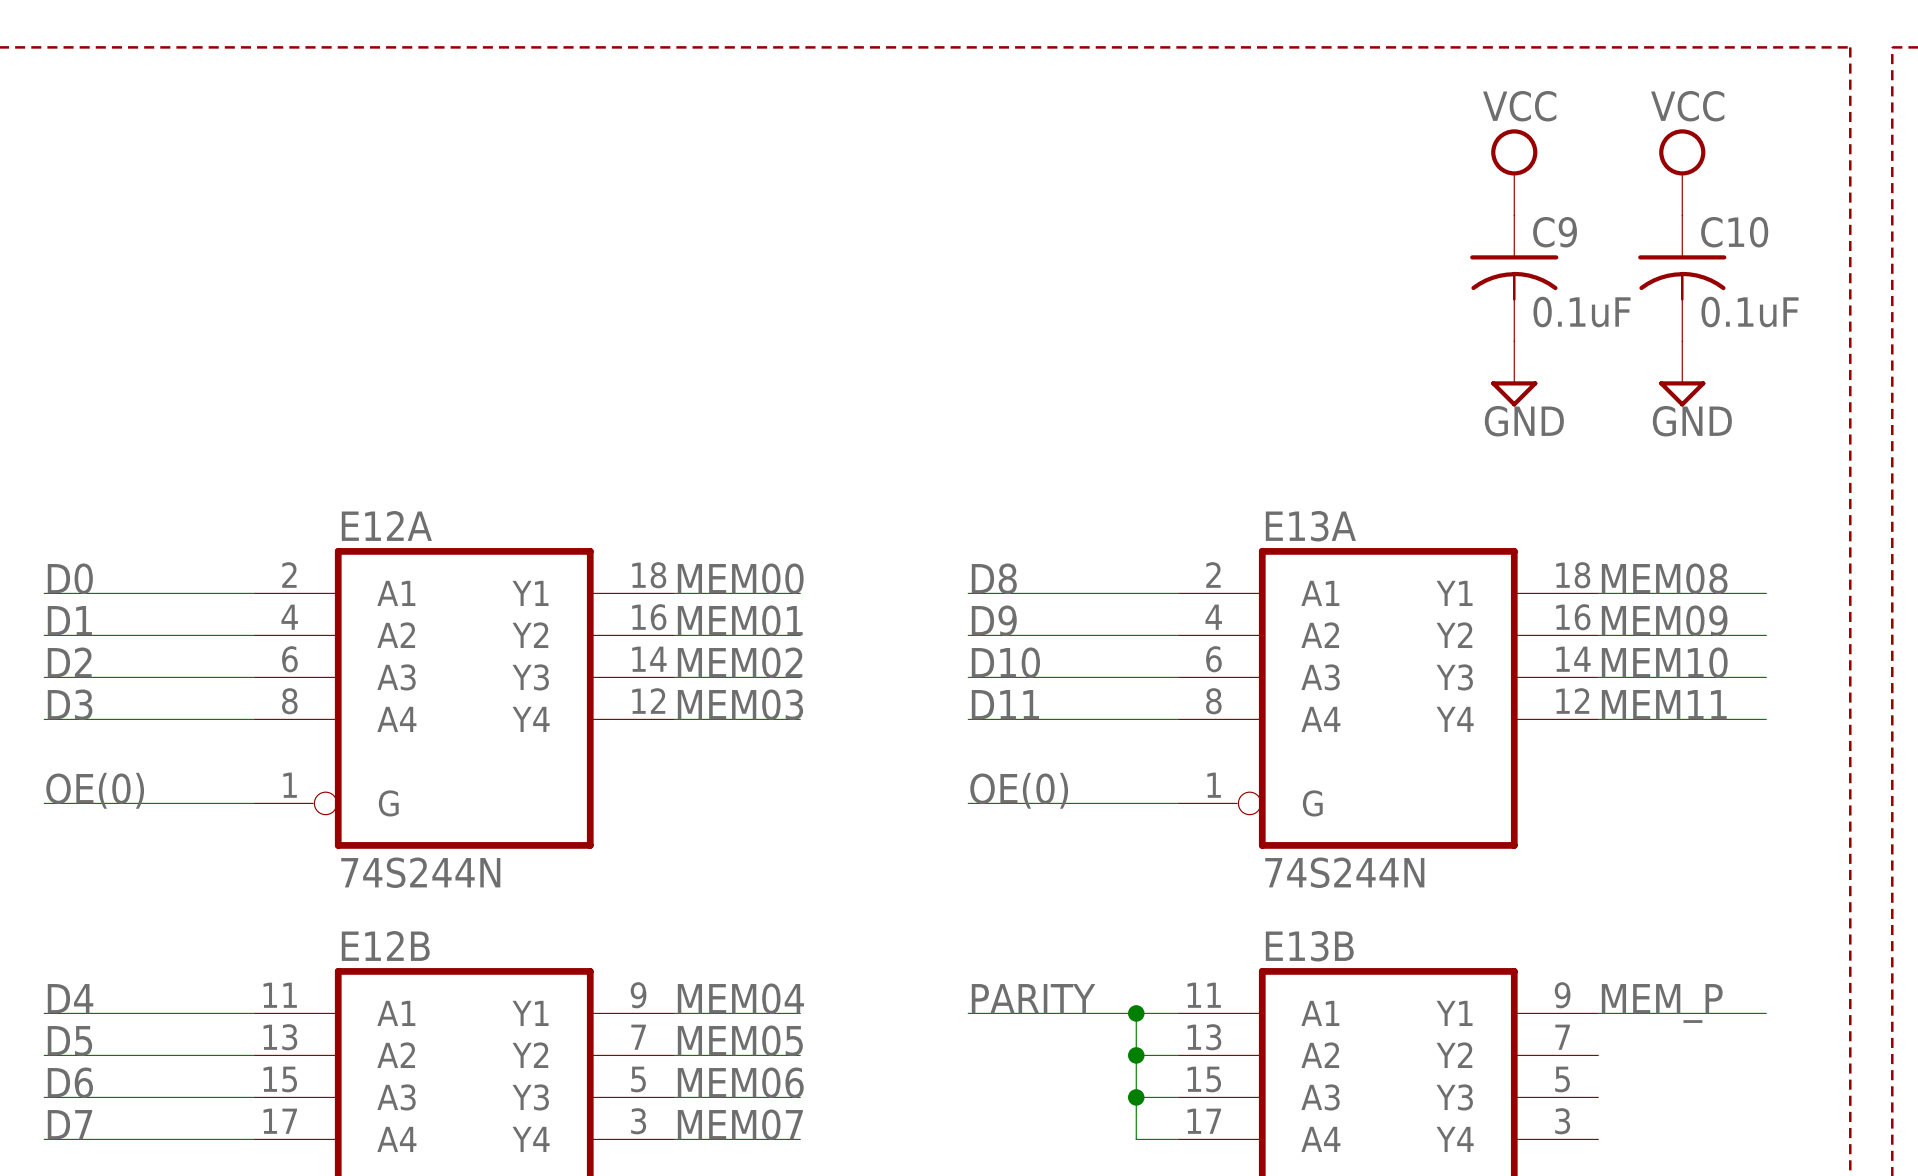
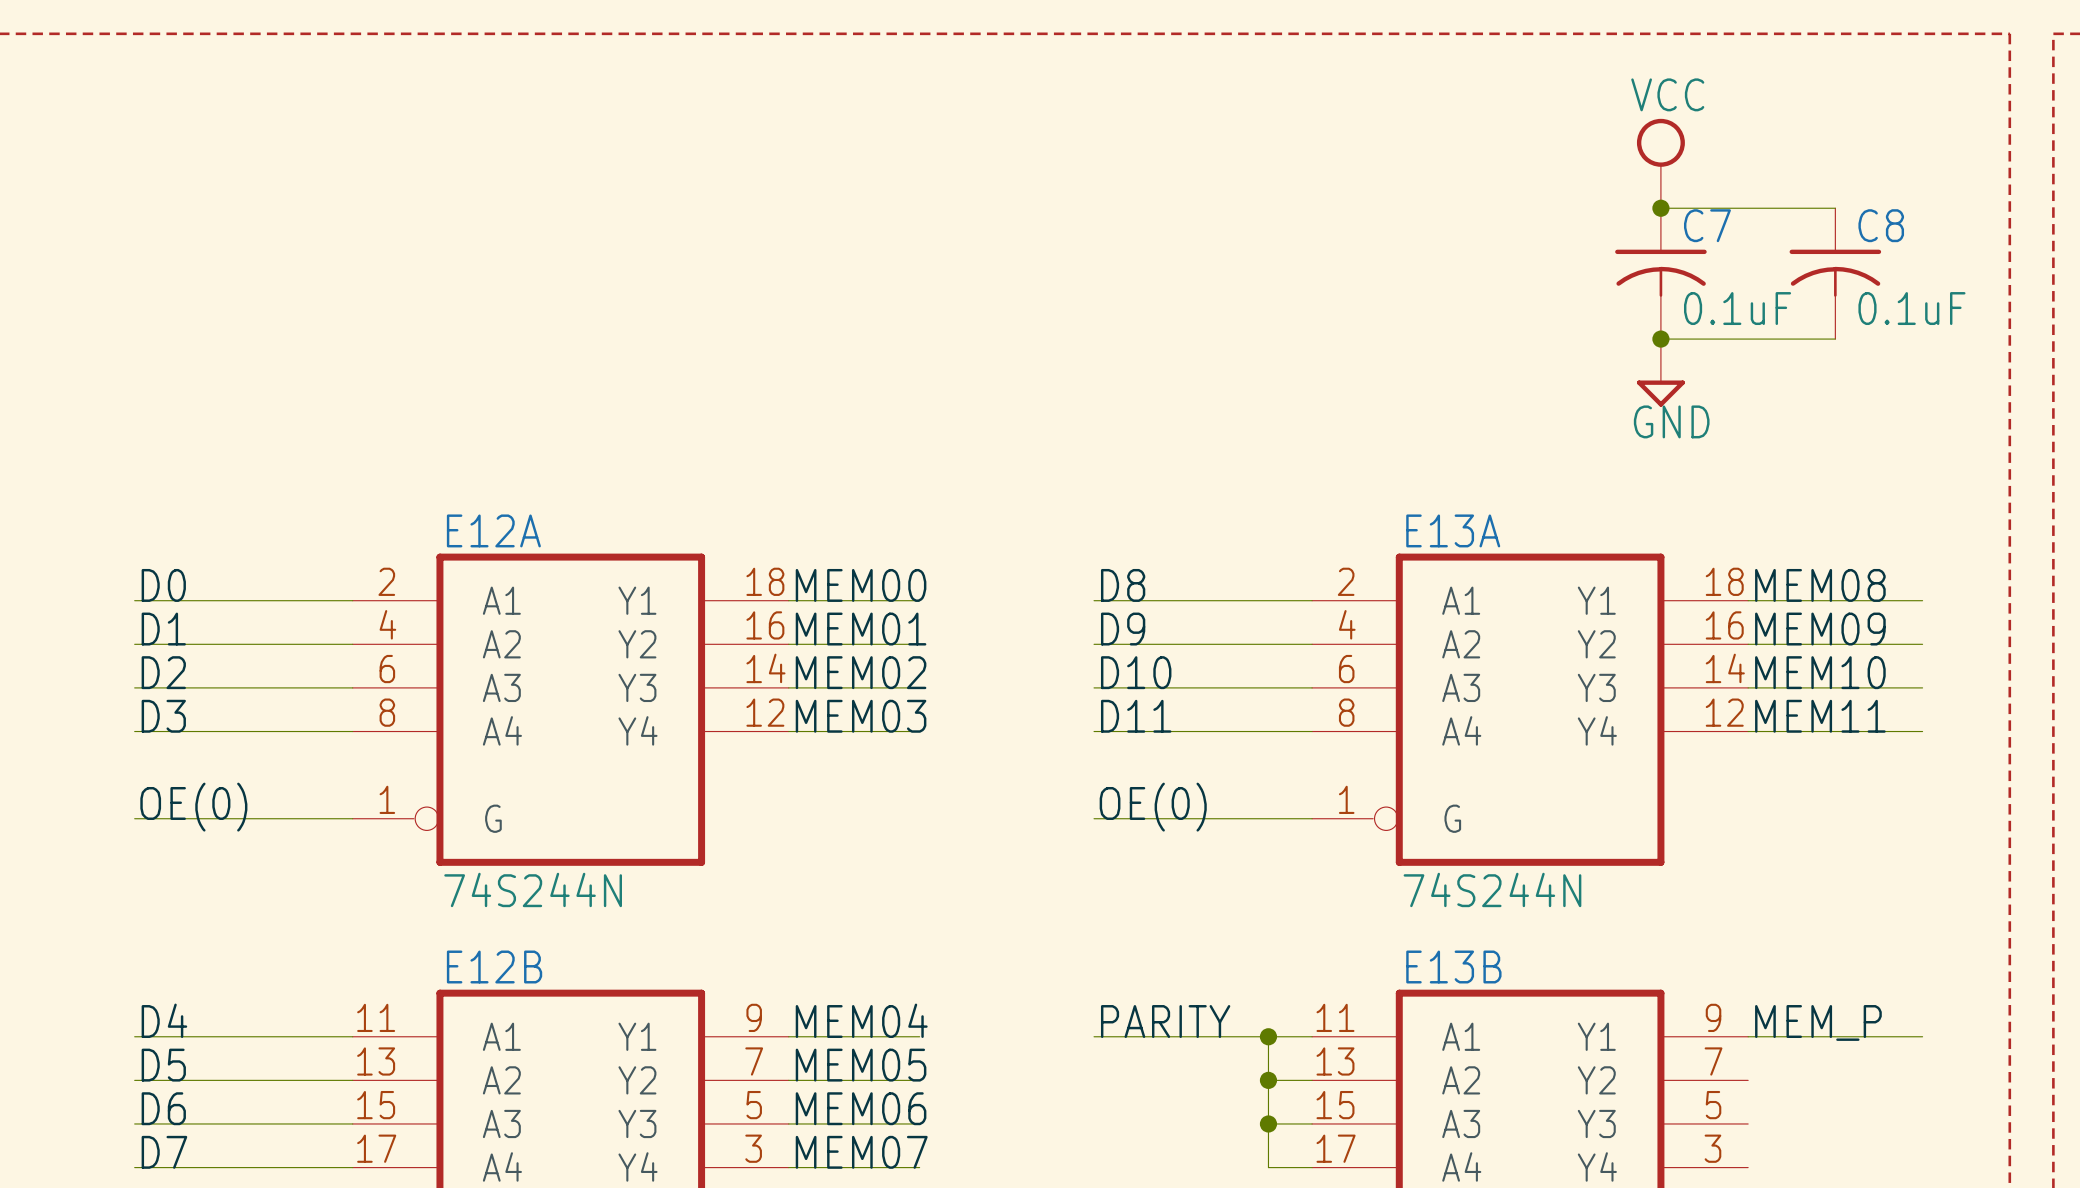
power symbol: VCC (1682, 172) -> none
wire: none -> (1660, 208) (1835, 208)
junction: none -> (1660, 208)
C9 name: C9 (1555, 232) -> C7 (1707, 225)
C10 name: C10 (1734, 232) -> C8 (1881, 225)
wire: none -> (1660, 339) (1835, 339)
junction: none -> (1660, 339)
power symbol: GND (1682, 373) -> none

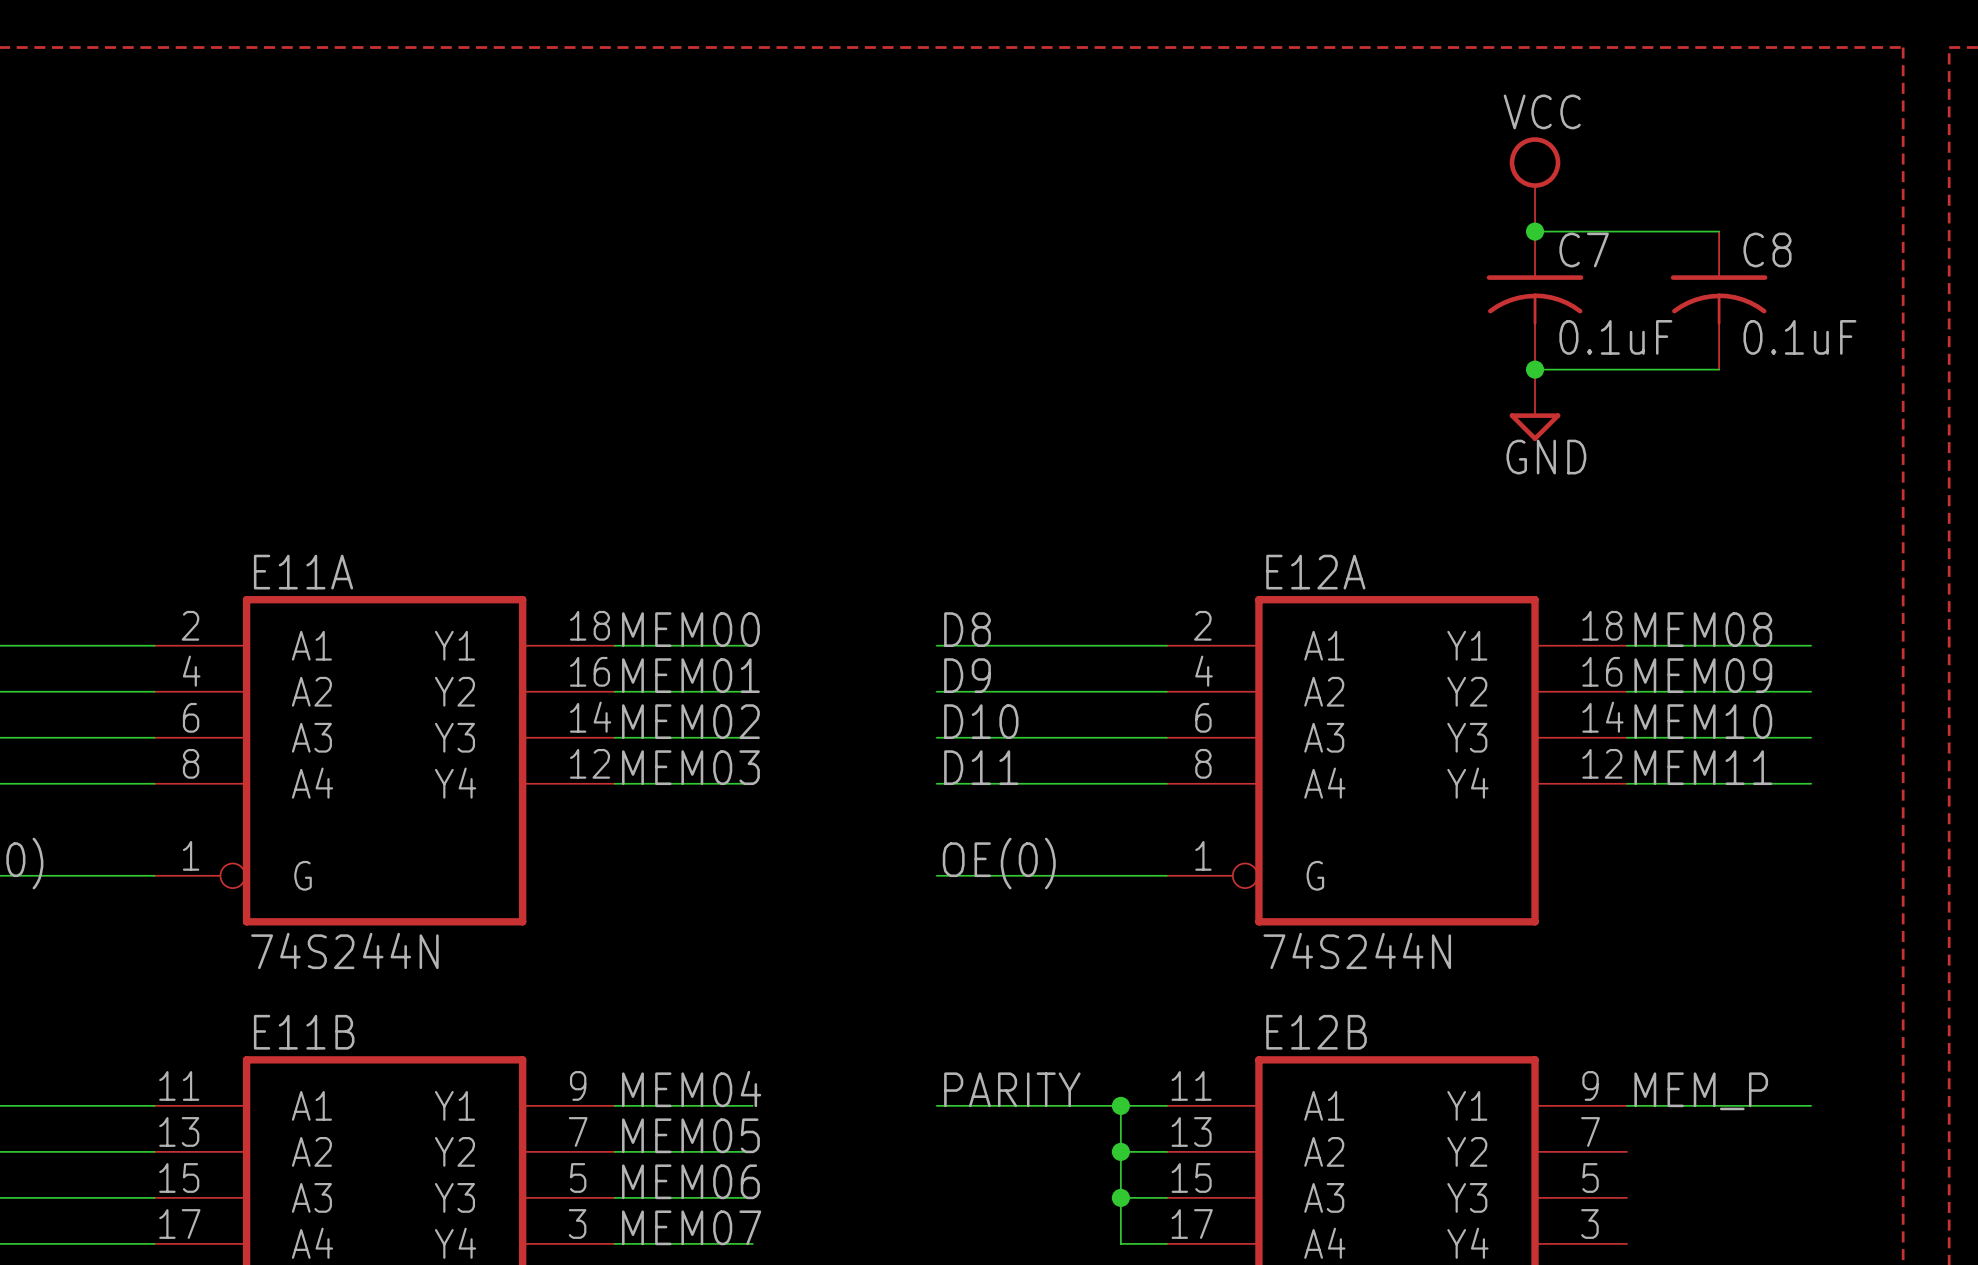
E12A name: E12A (493, 530) -> E11A (303, 572)
E13A name: E13A (1453, 530) -> E12A (1315, 572)
E12B name: E12B (494, 967) -> E11B (304, 1032)
E13B name: E13B (1453, 967) -> E12B (1316, 1032)

